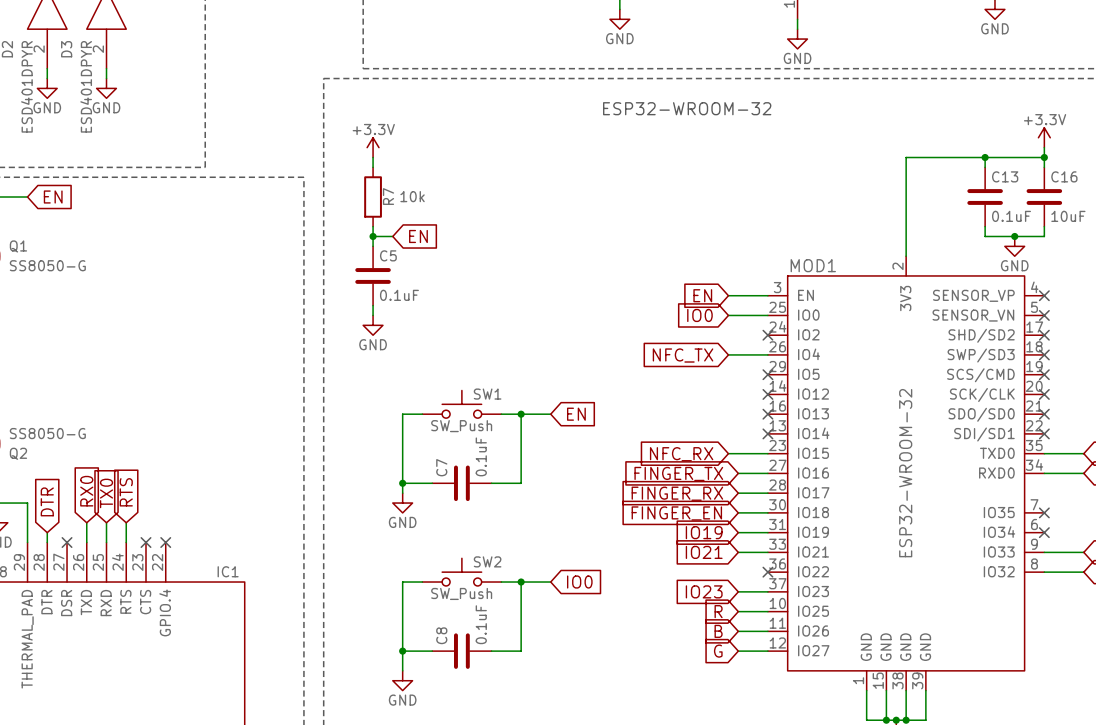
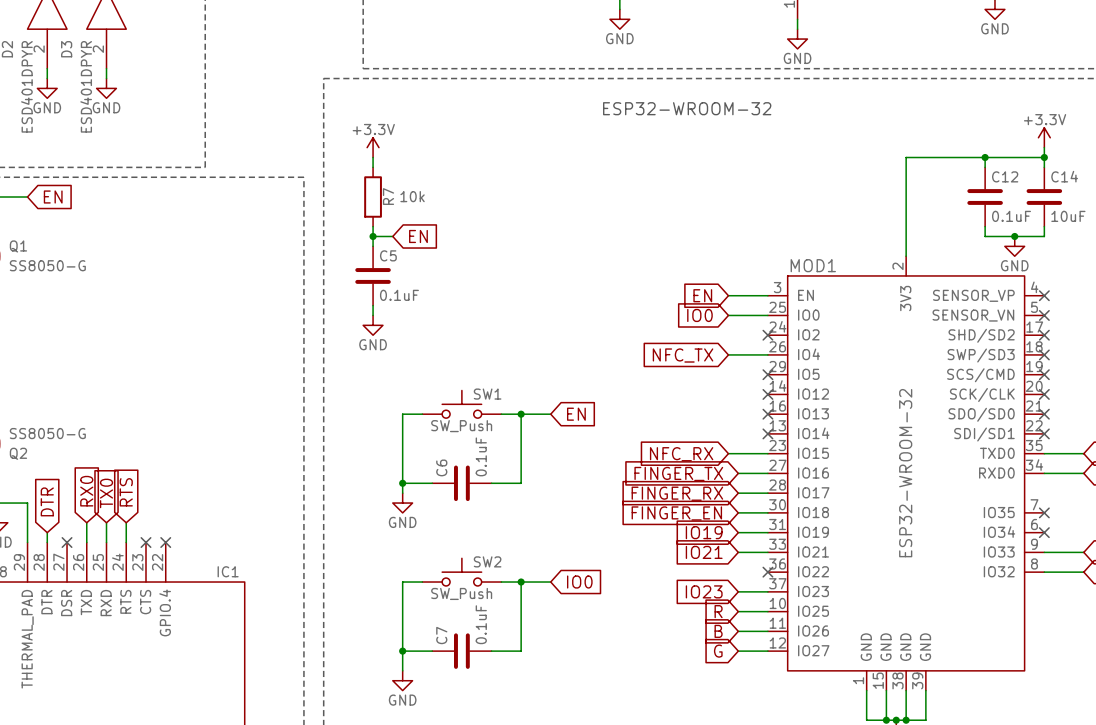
C13 name: C13 (1005, 176) -> C12 (1005, 176)
C16 name: C16 (1064, 176) -> C14 (1064, 176)
C7 name: C7 (441, 467) -> C6 (441, 467)
C8 name: C8 (441, 635) -> C7 (441, 635)

